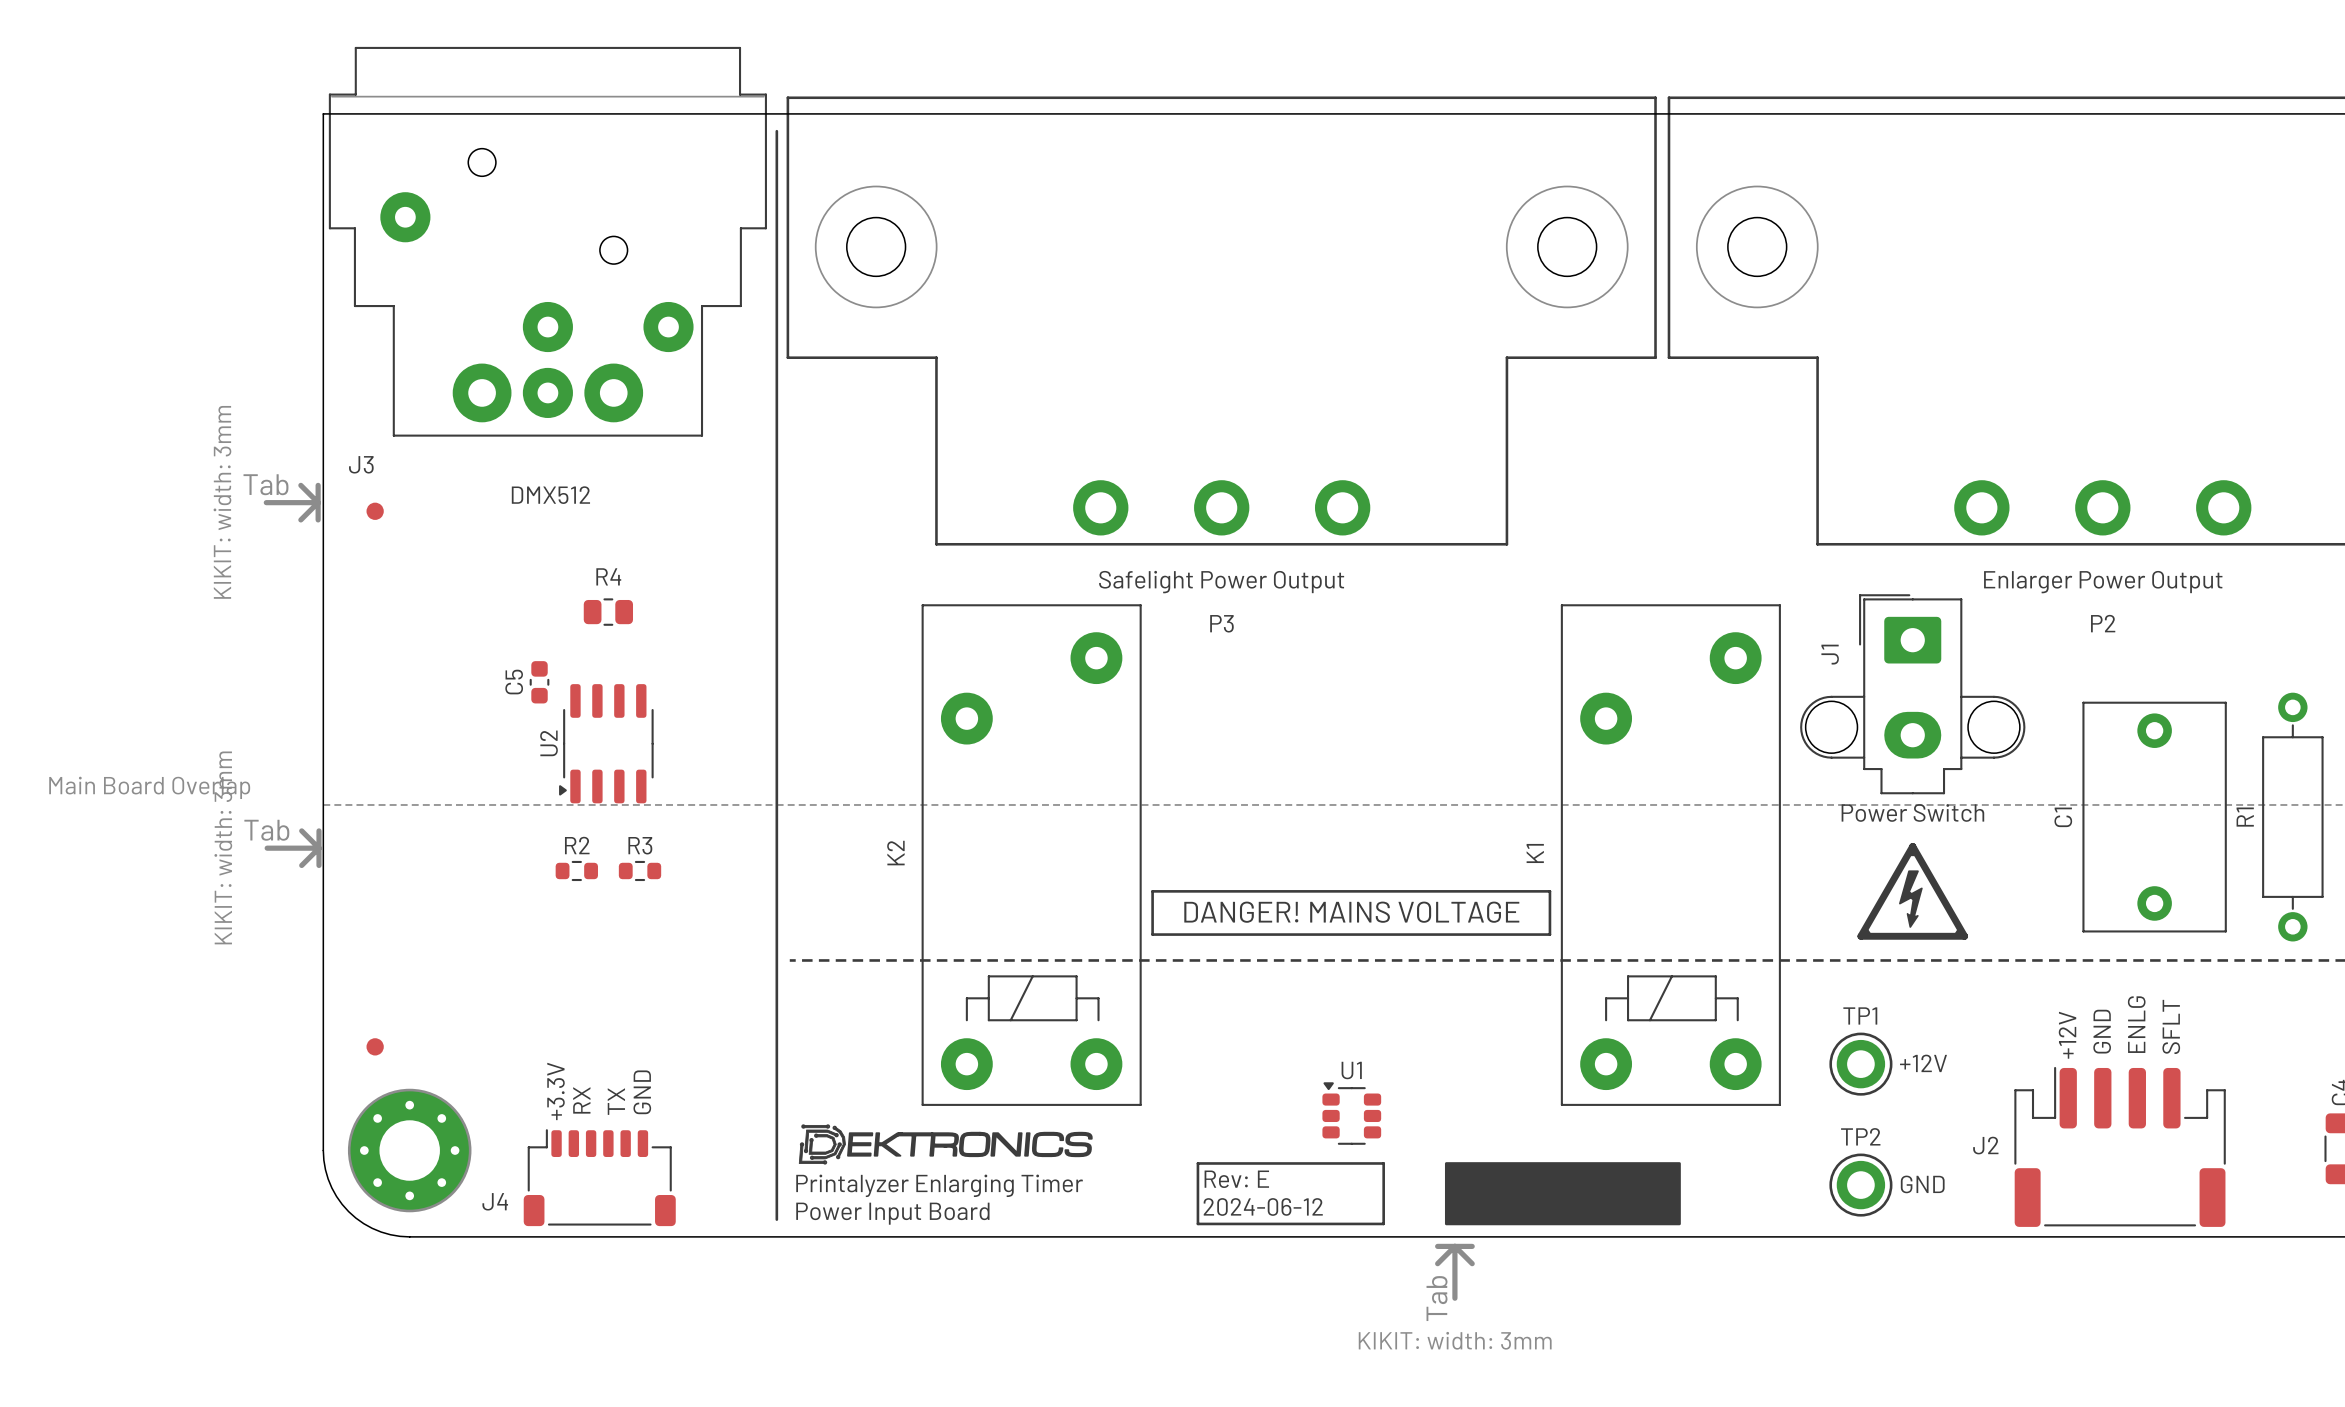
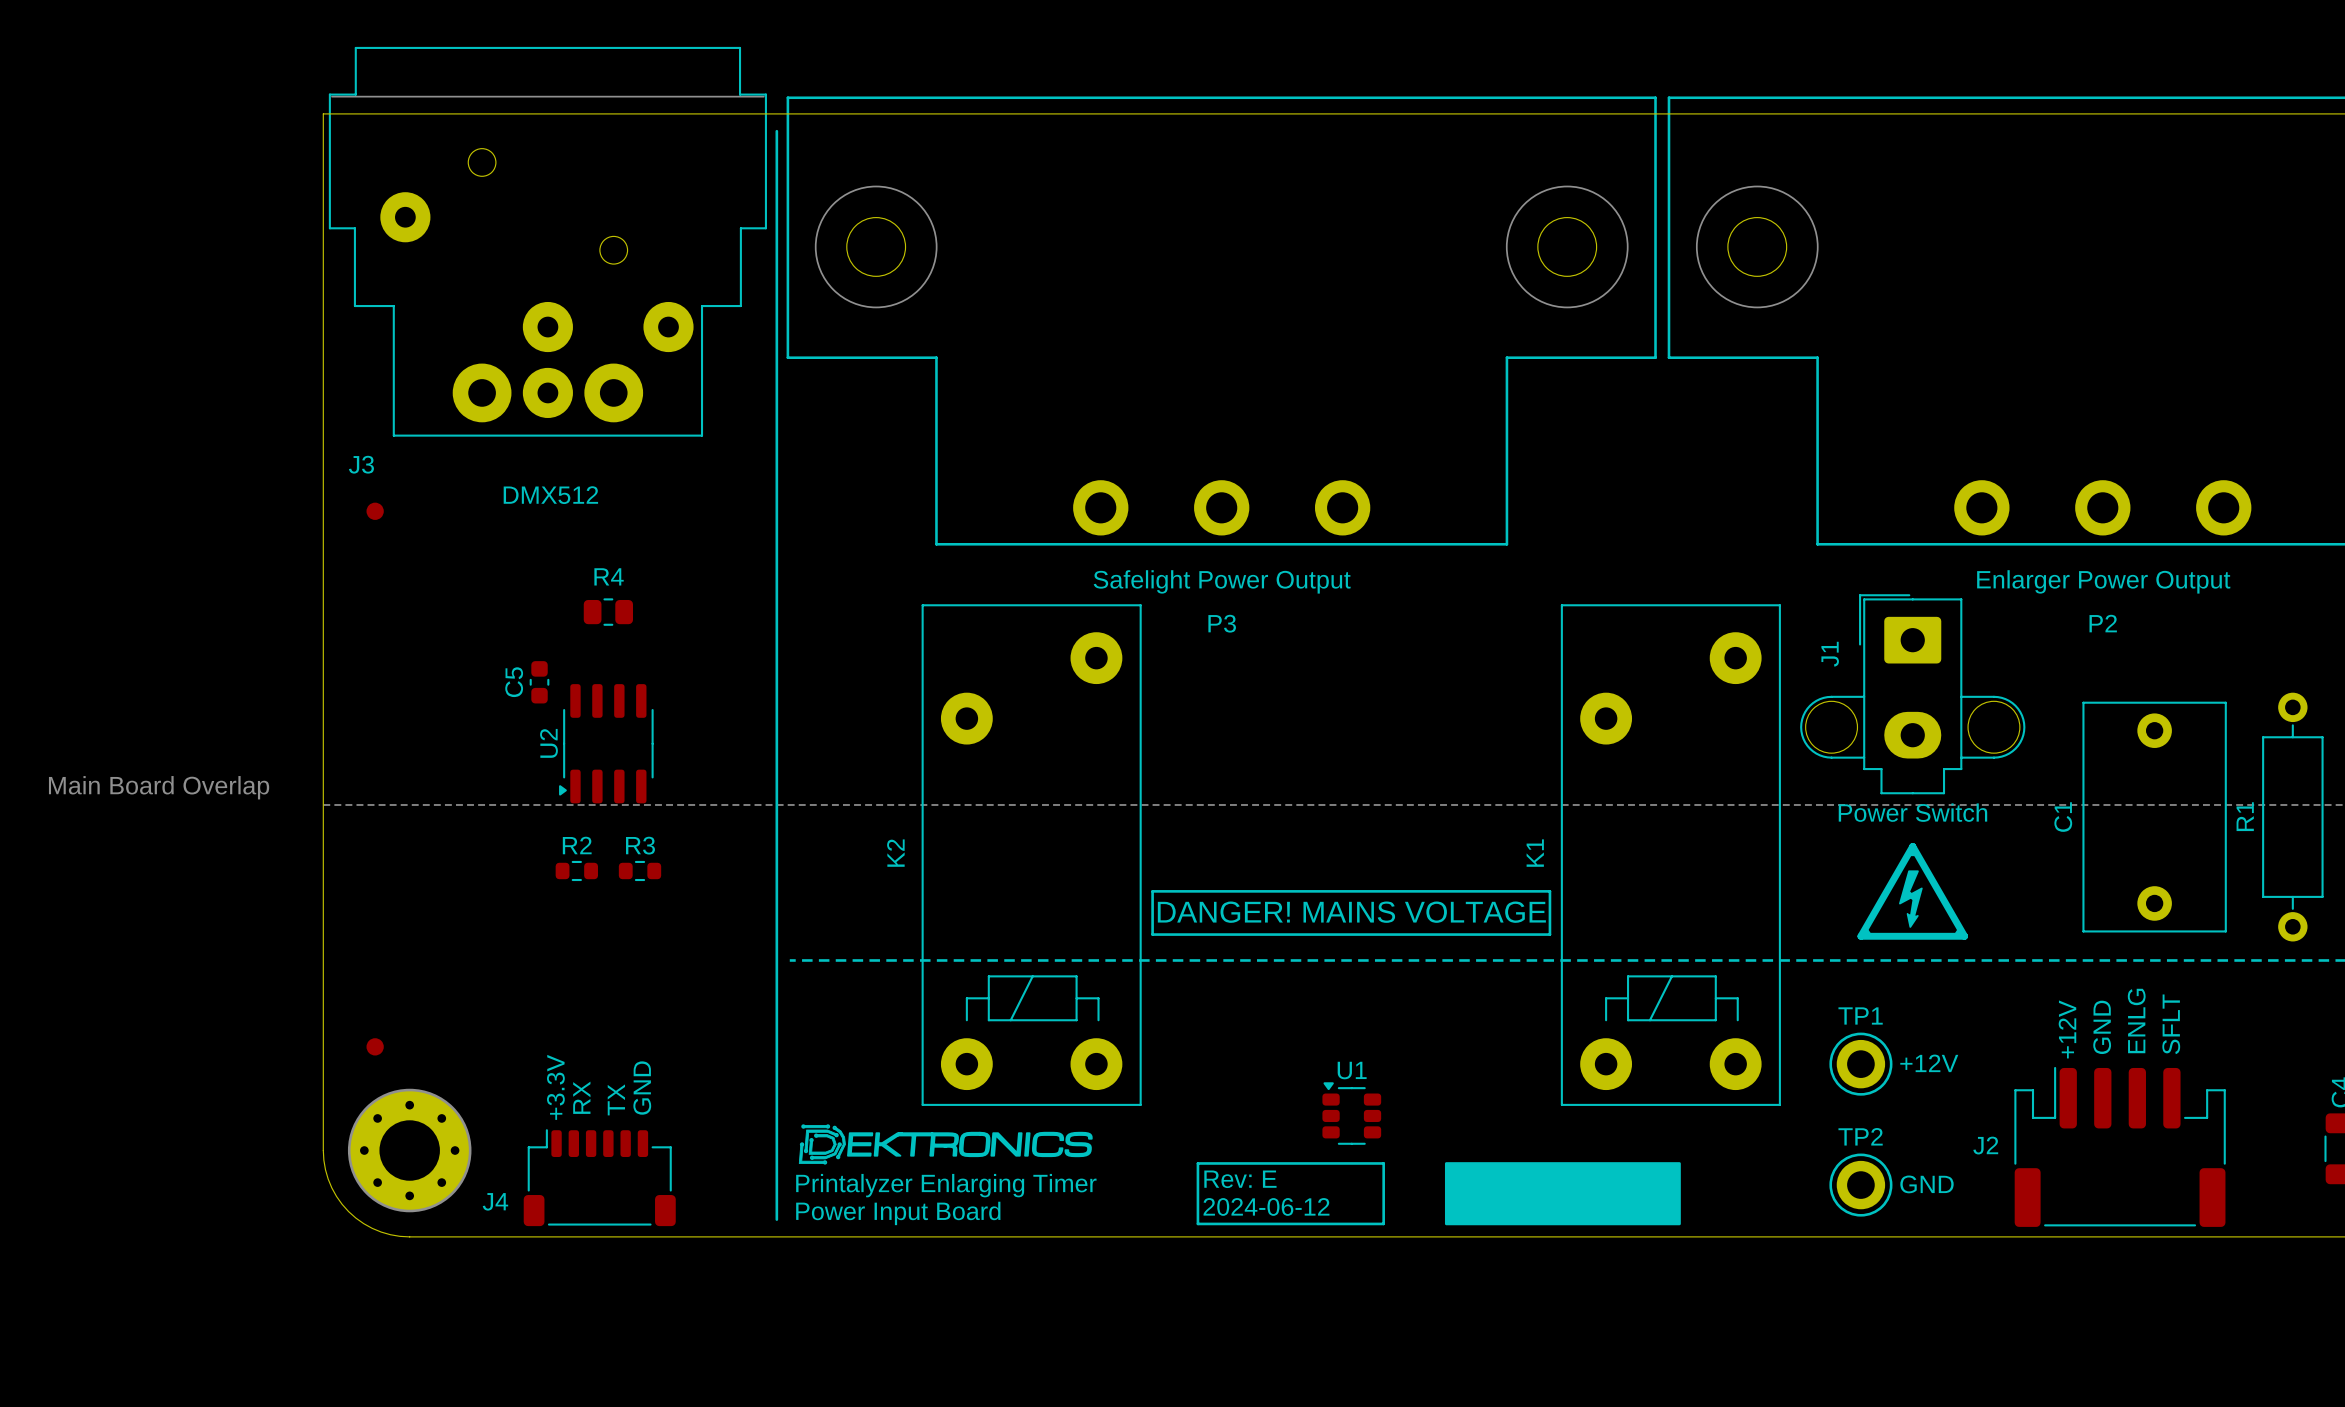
drawing: [263, 482, 321, 523] -> none
drawing: [264, 828, 322, 869] -> none
drawing: [1435, 1243, 1475, 1301] -> none

